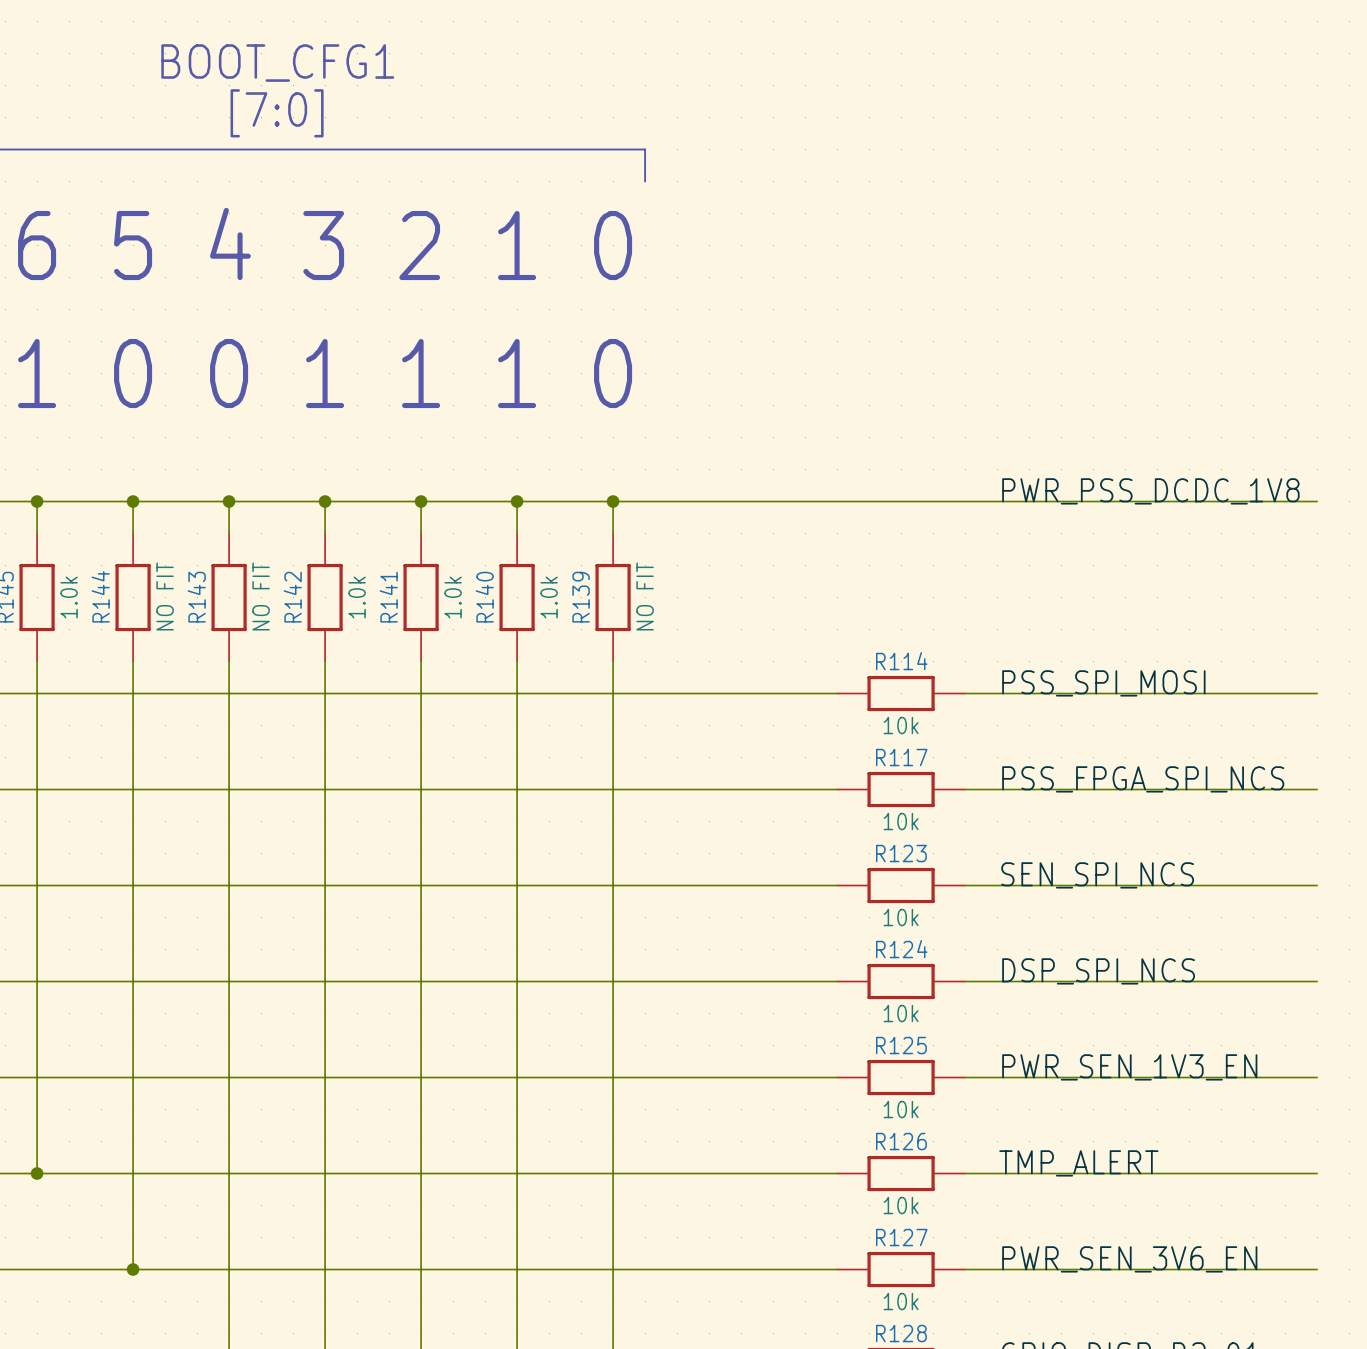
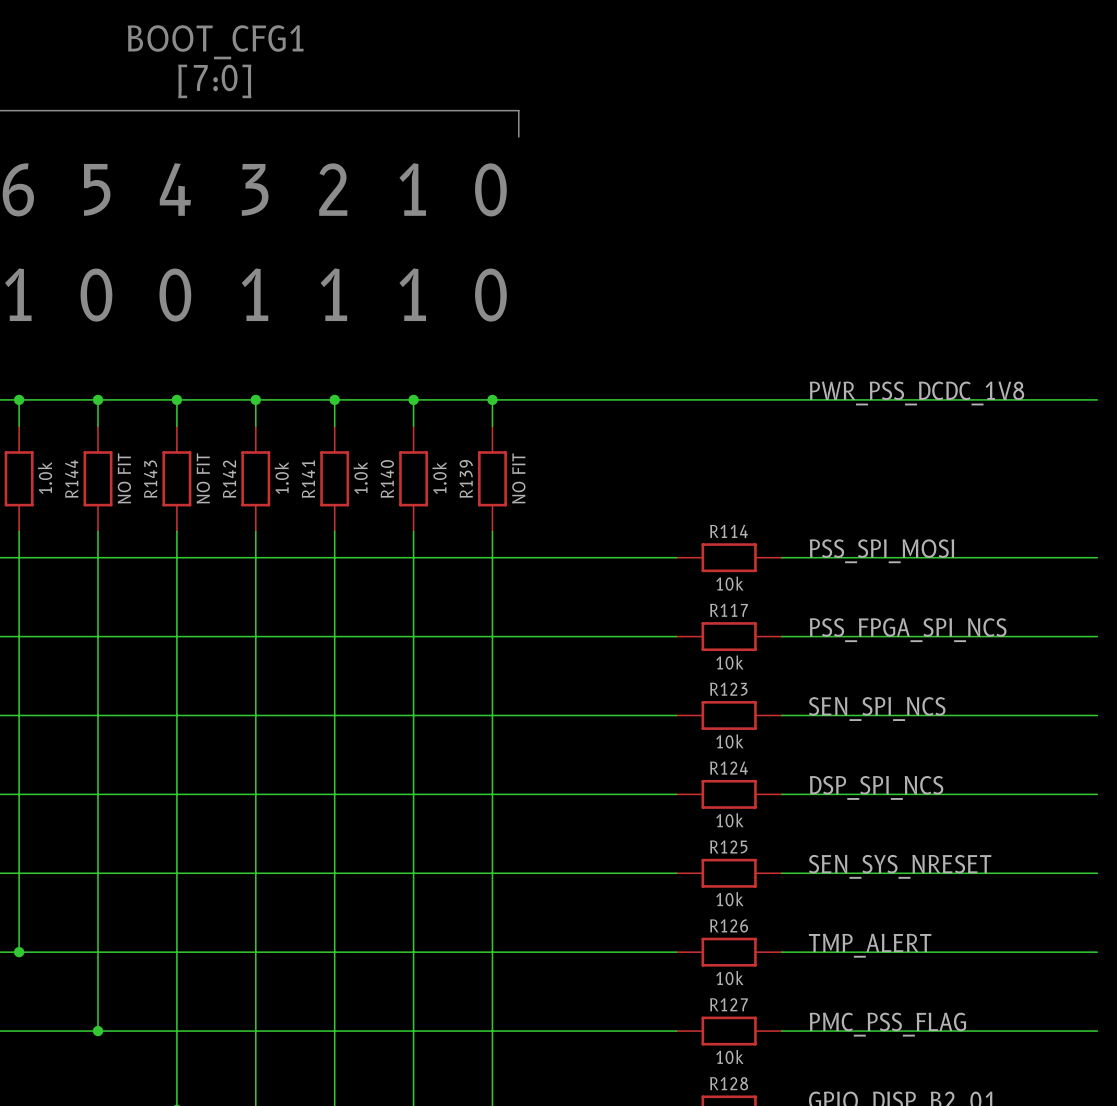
wire: none -> (1071, 399) (1097, 399)
wire: none -> (1071, 557) (1097, 557)
wire: none -> (1071, 636) (1097, 636)
wire: none -> (1071, 715) (1097, 715)
wire: none -> (1071, 794) (1097, 794)
label: PWR_SEN_1V3_EN (1129, 1067) -> SEN_SYS_NRESET (900, 866)
wire: none -> (1071, 873) (1097, 873)
wire: none -> (1071, 952) (1097, 952)
label: PWR_SEN_3V6_EN (1129, 1259) -> PMC_PSS_FLAG (887, 1024)
wire: none -> (1071, 1031) (1097, 1031)

